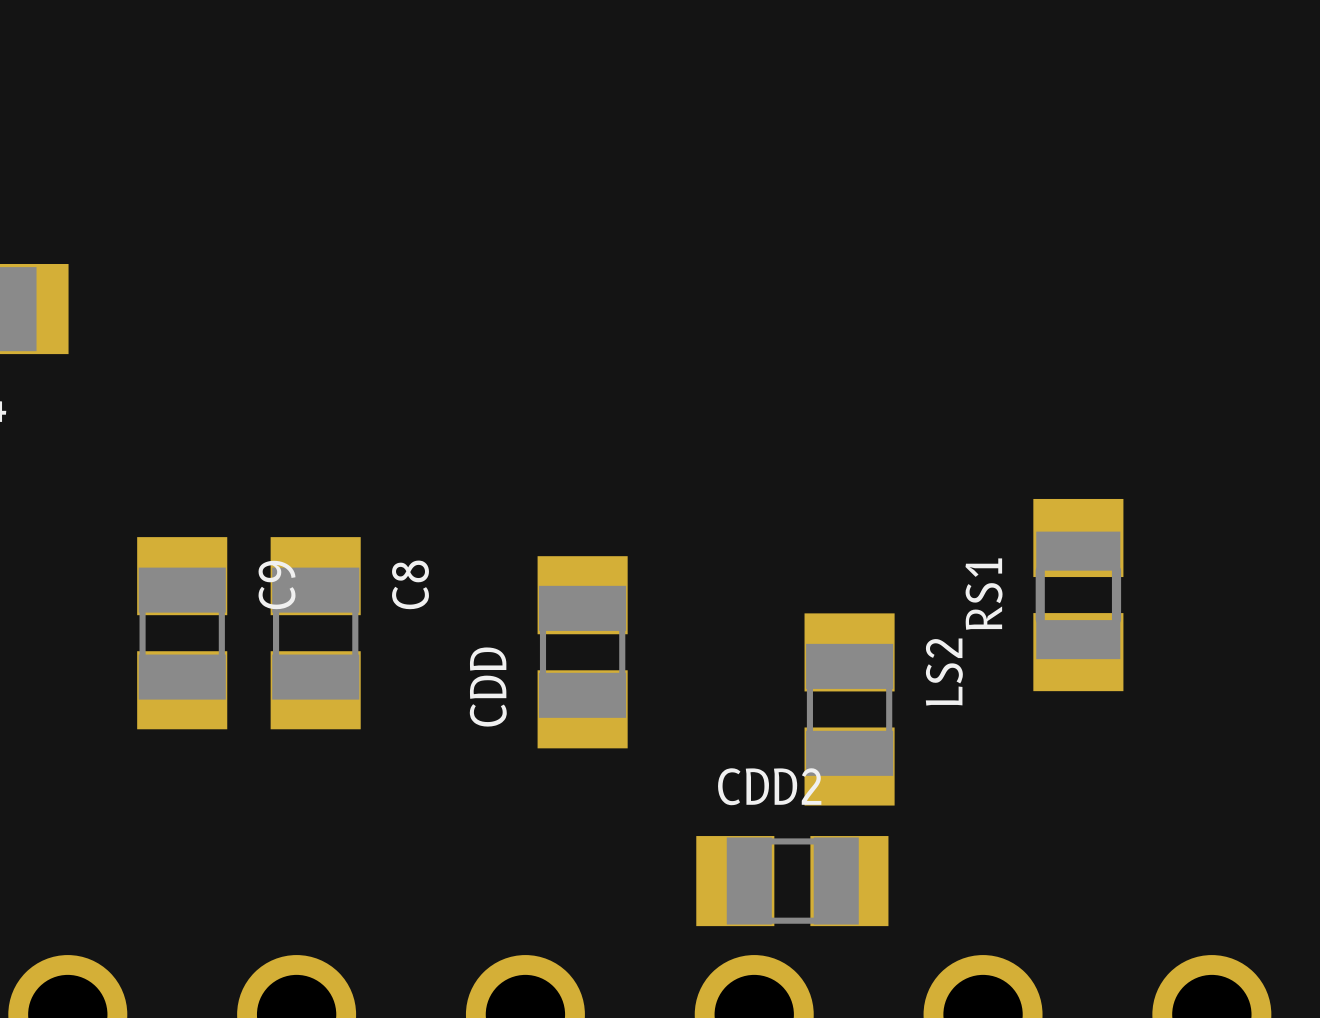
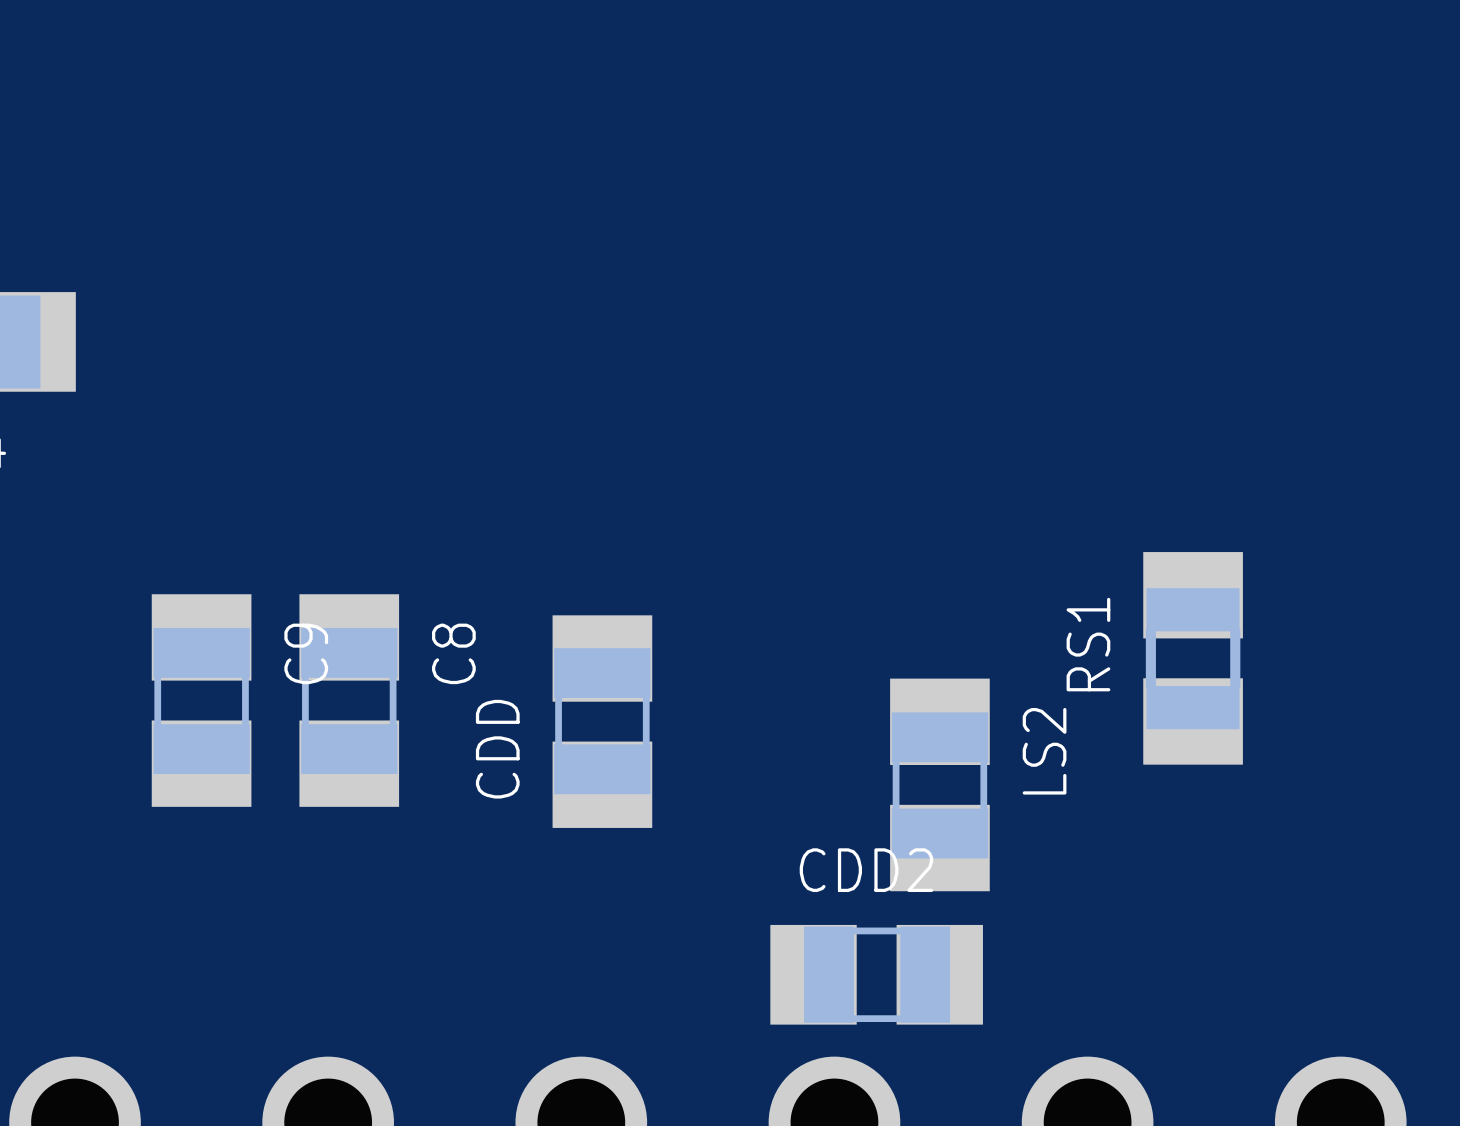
CDD position: (582, 652) -> (602, 721)

